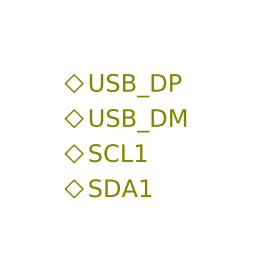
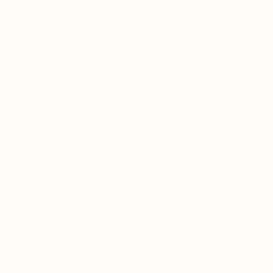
hierarchical label: USB_DP (135, 85) -> none
hierarchical label: USB_DM (137, 120) -> none
hierarchical label: SCL1 (117, 153) -> none
hierarchical label: SDA1 (120, 188) -> none

